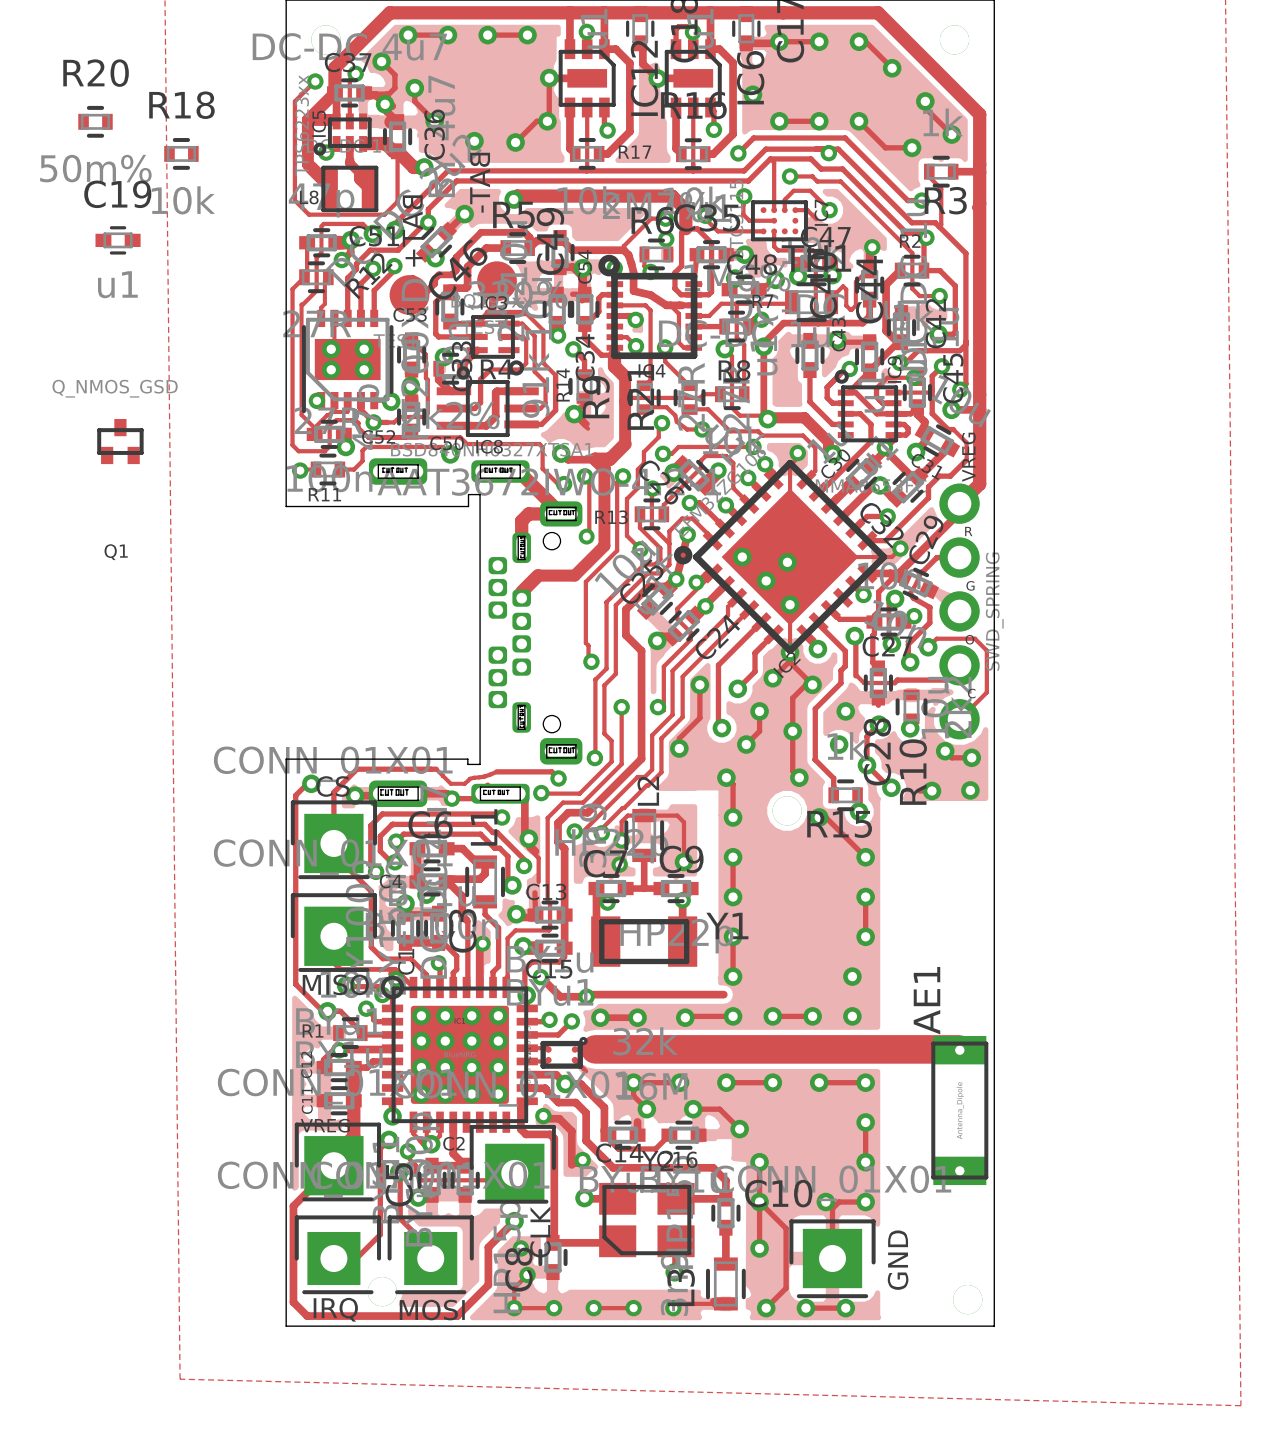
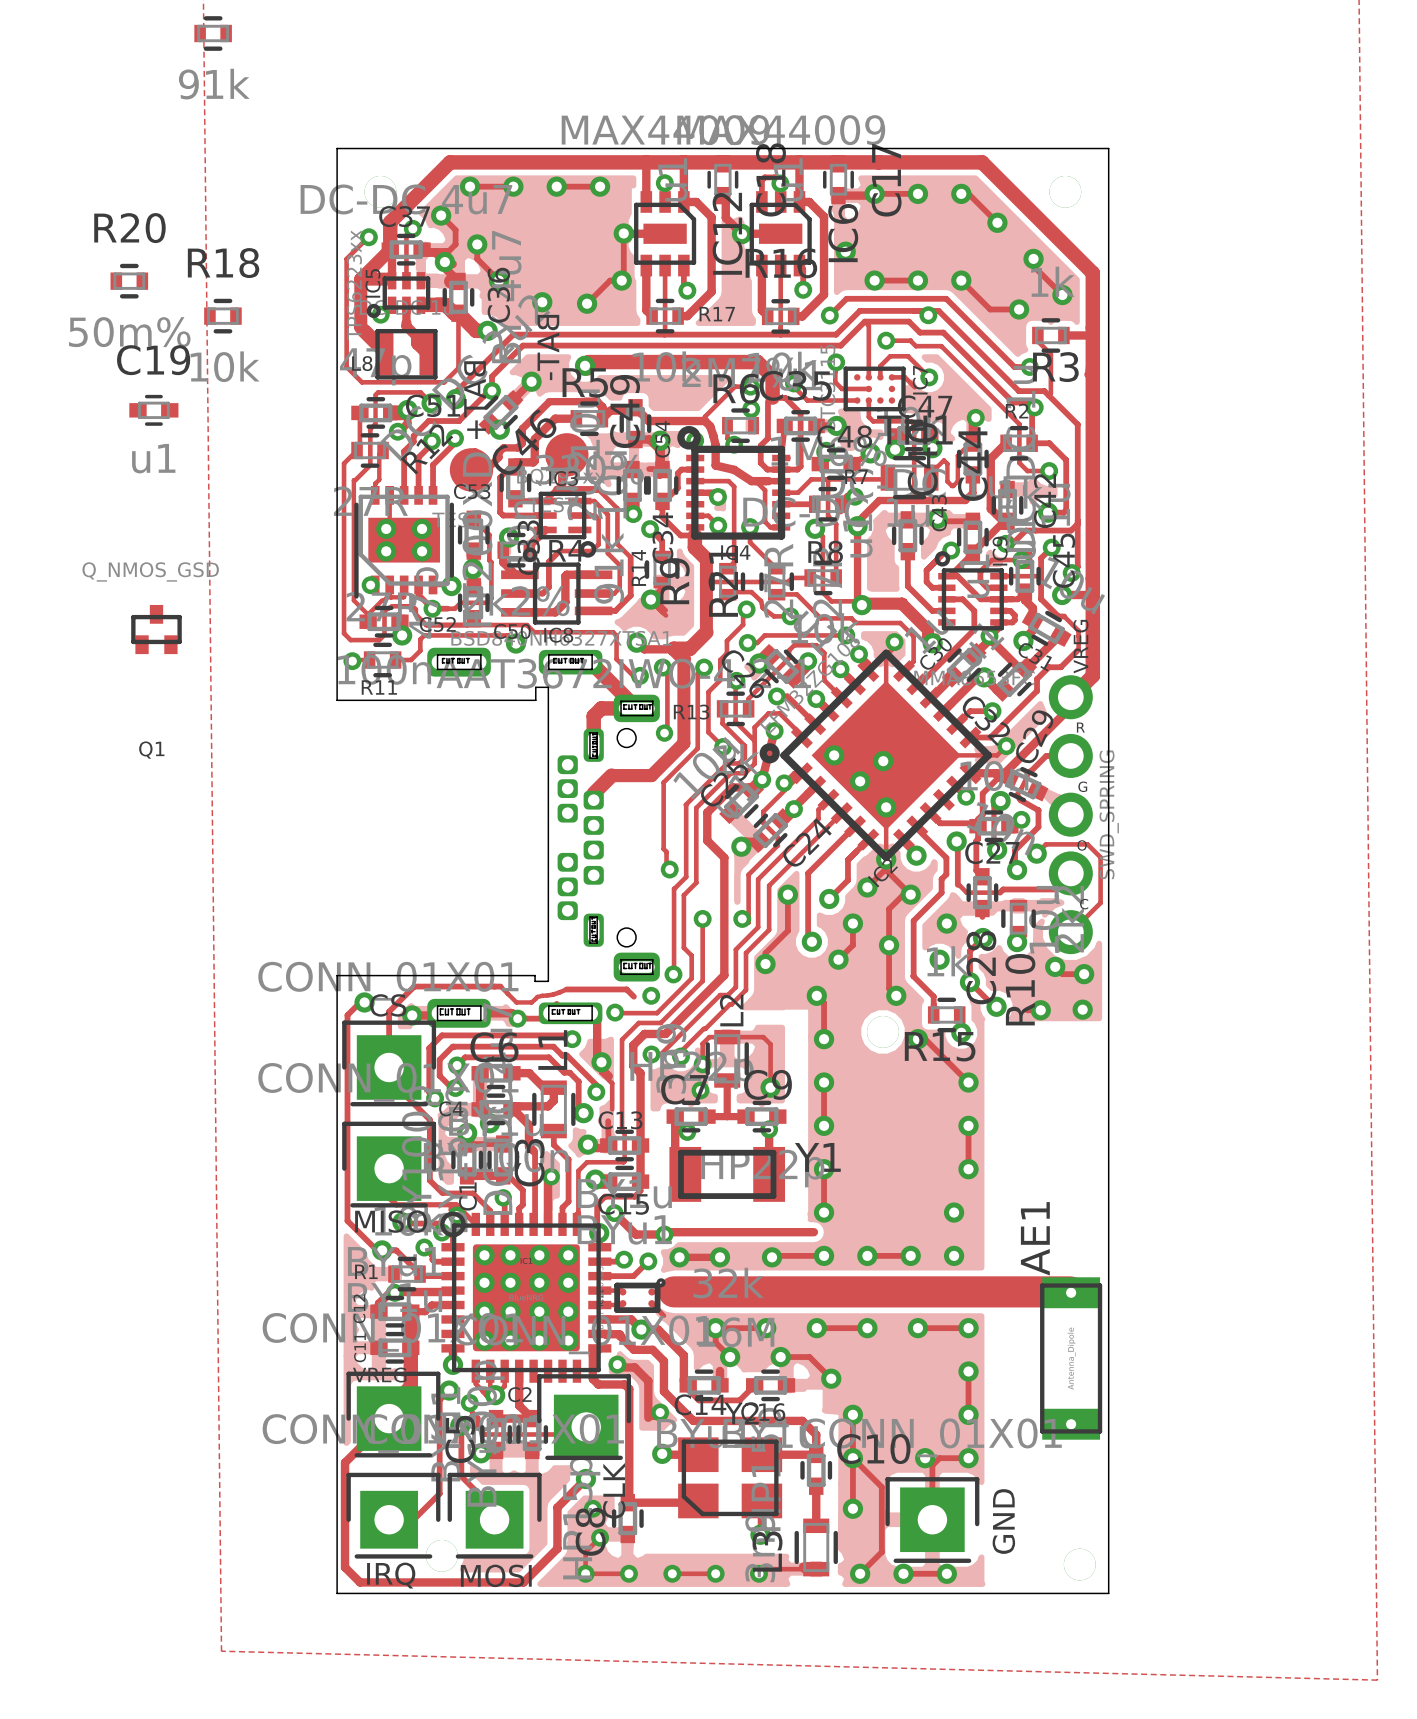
via position: (558, 778) -> (651, 995)

